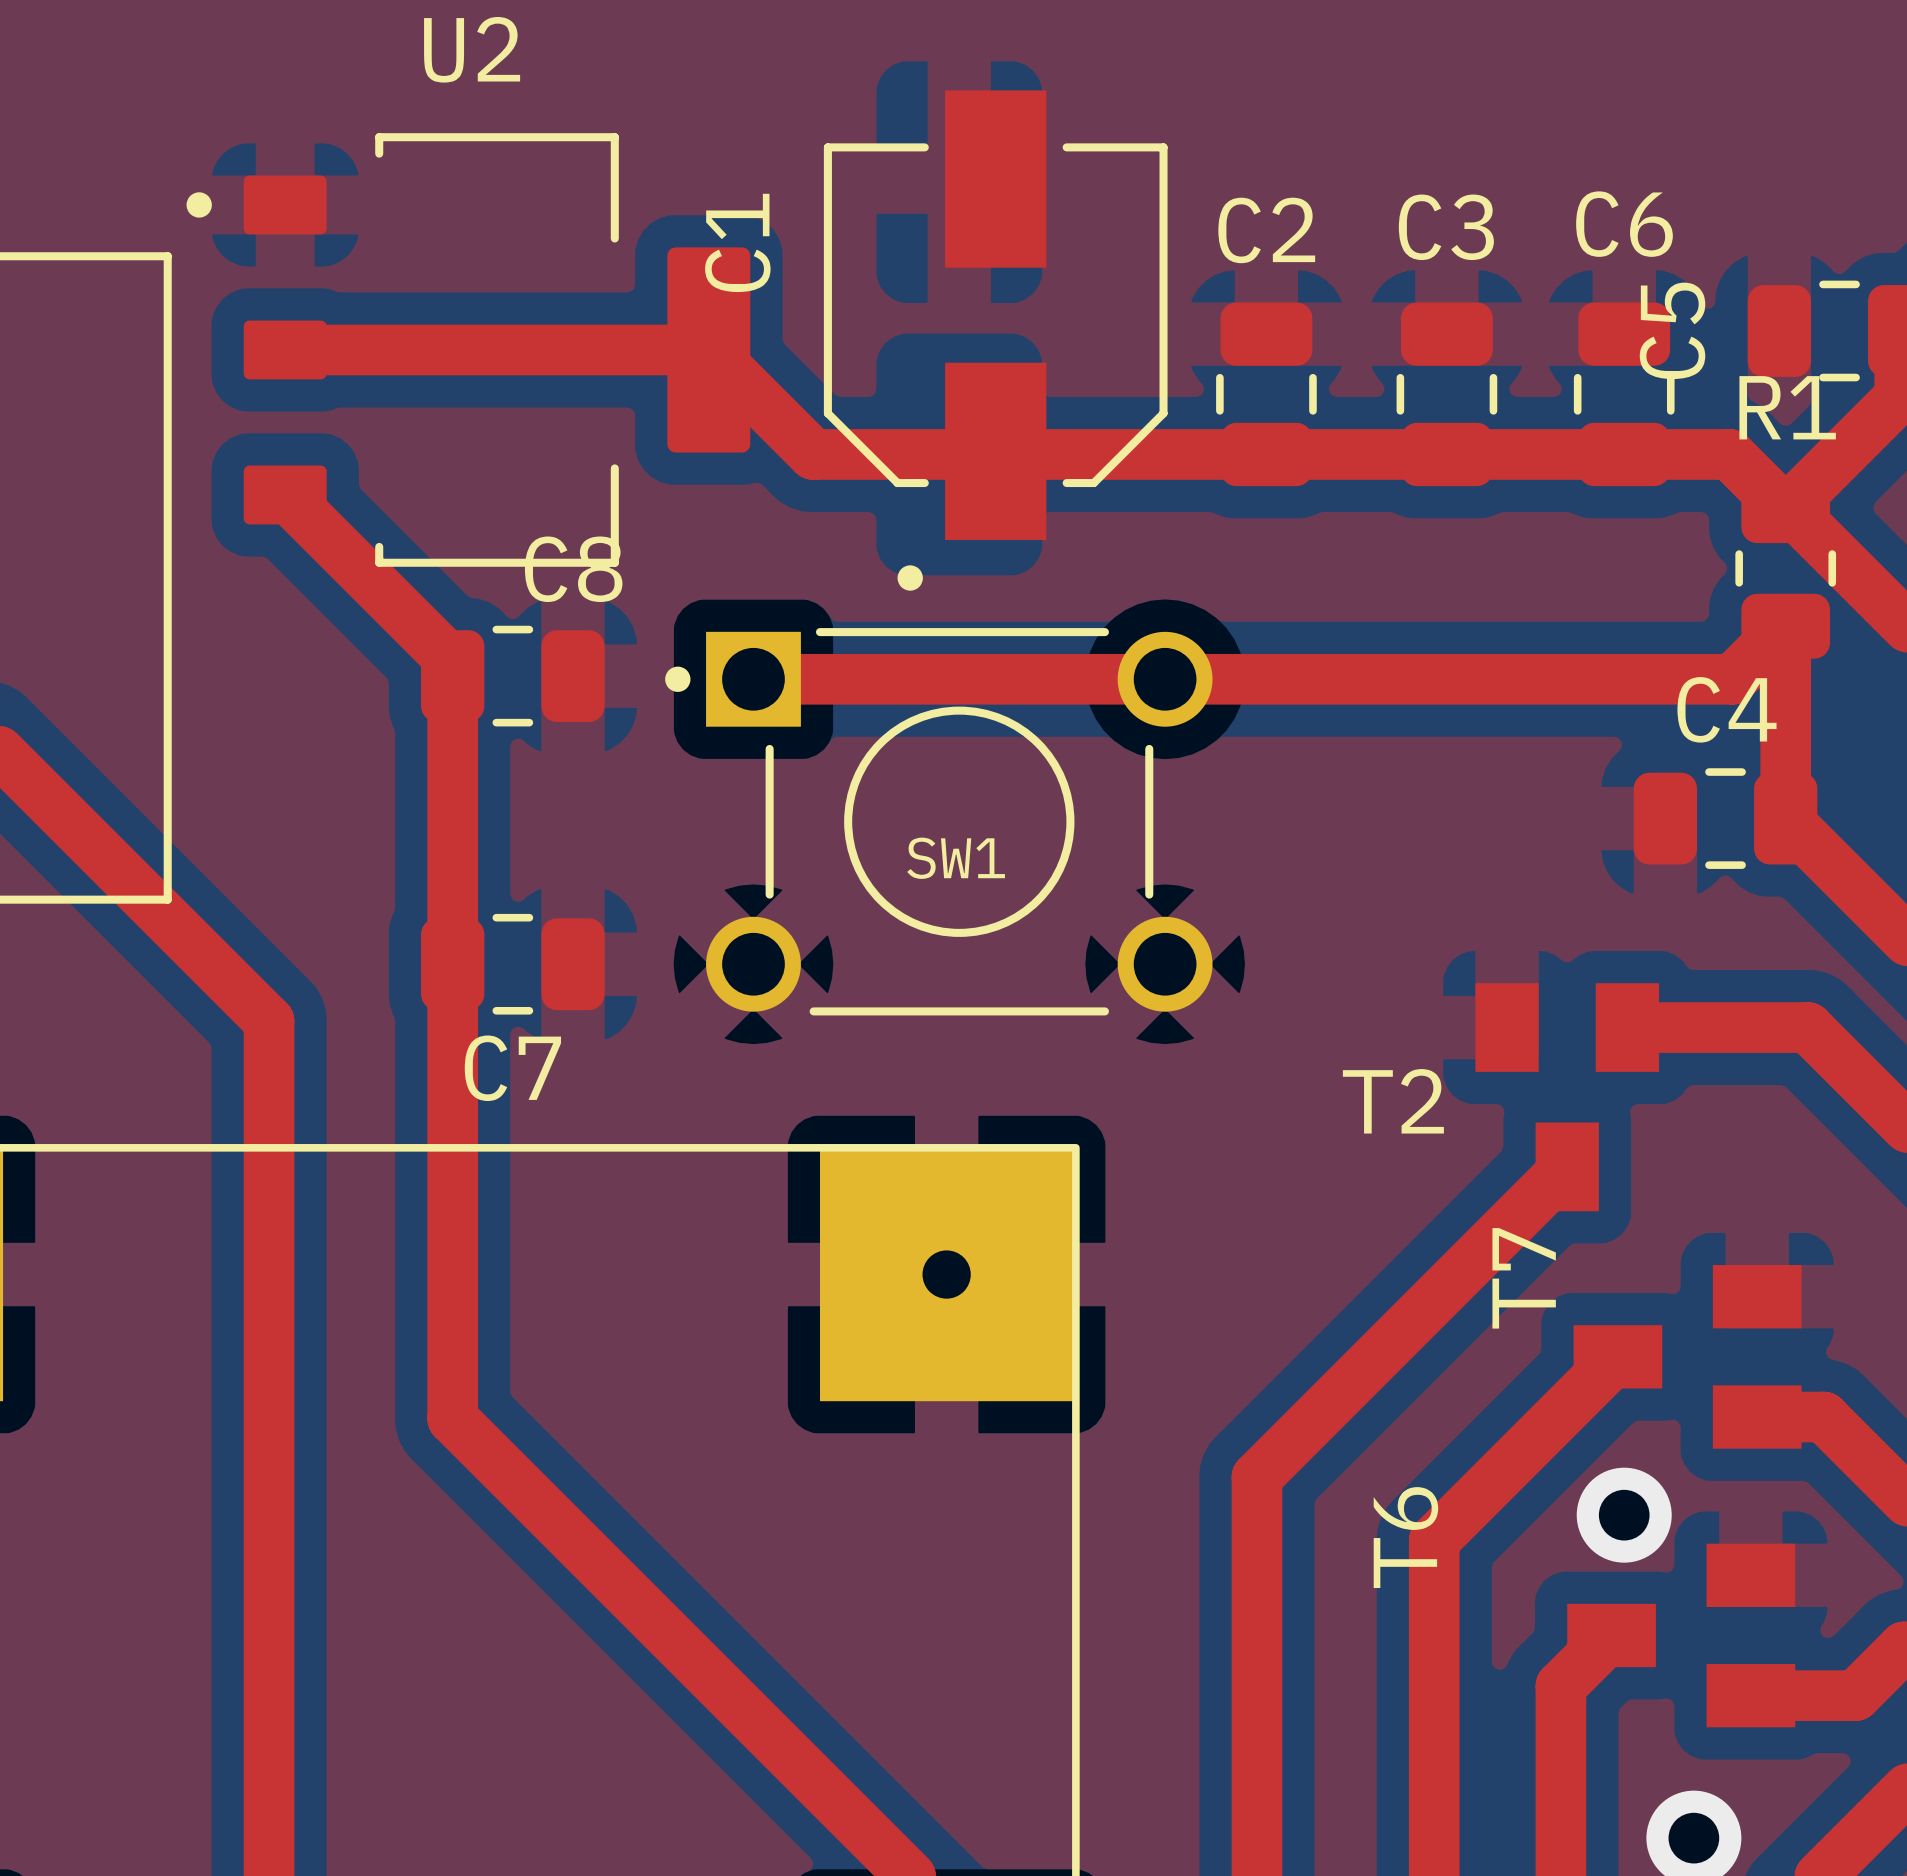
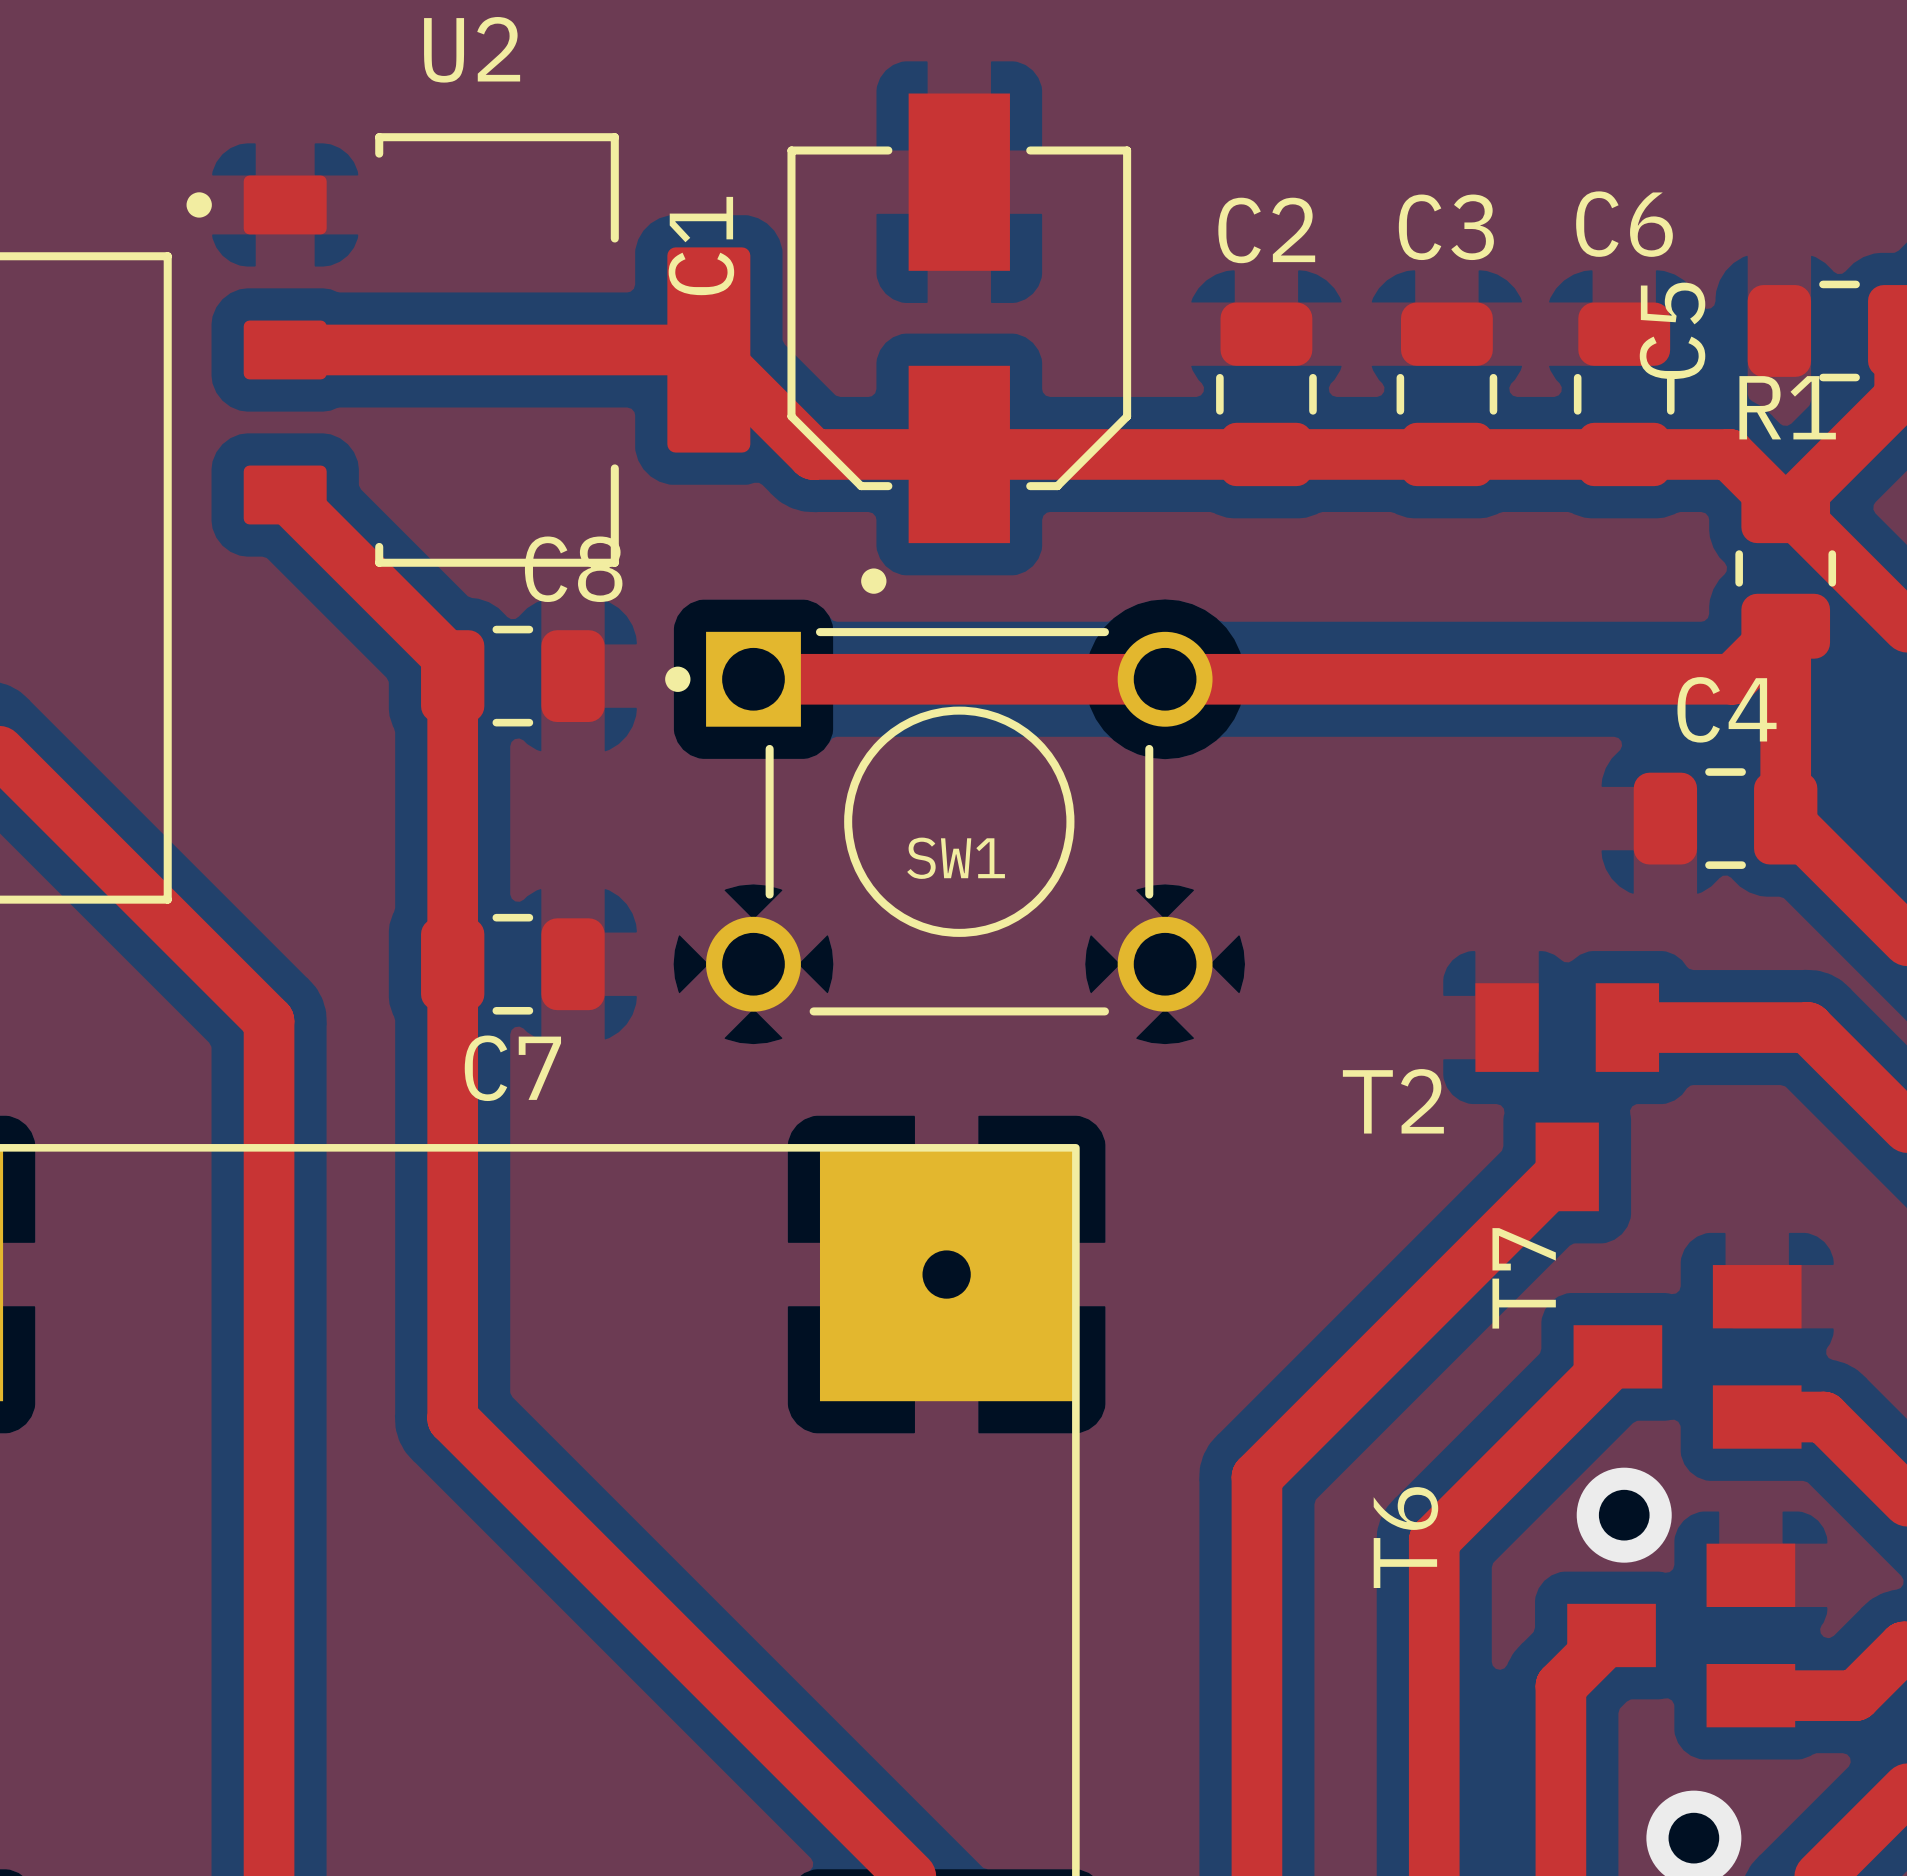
C1 position: (995, 340) -> (959, 343)

